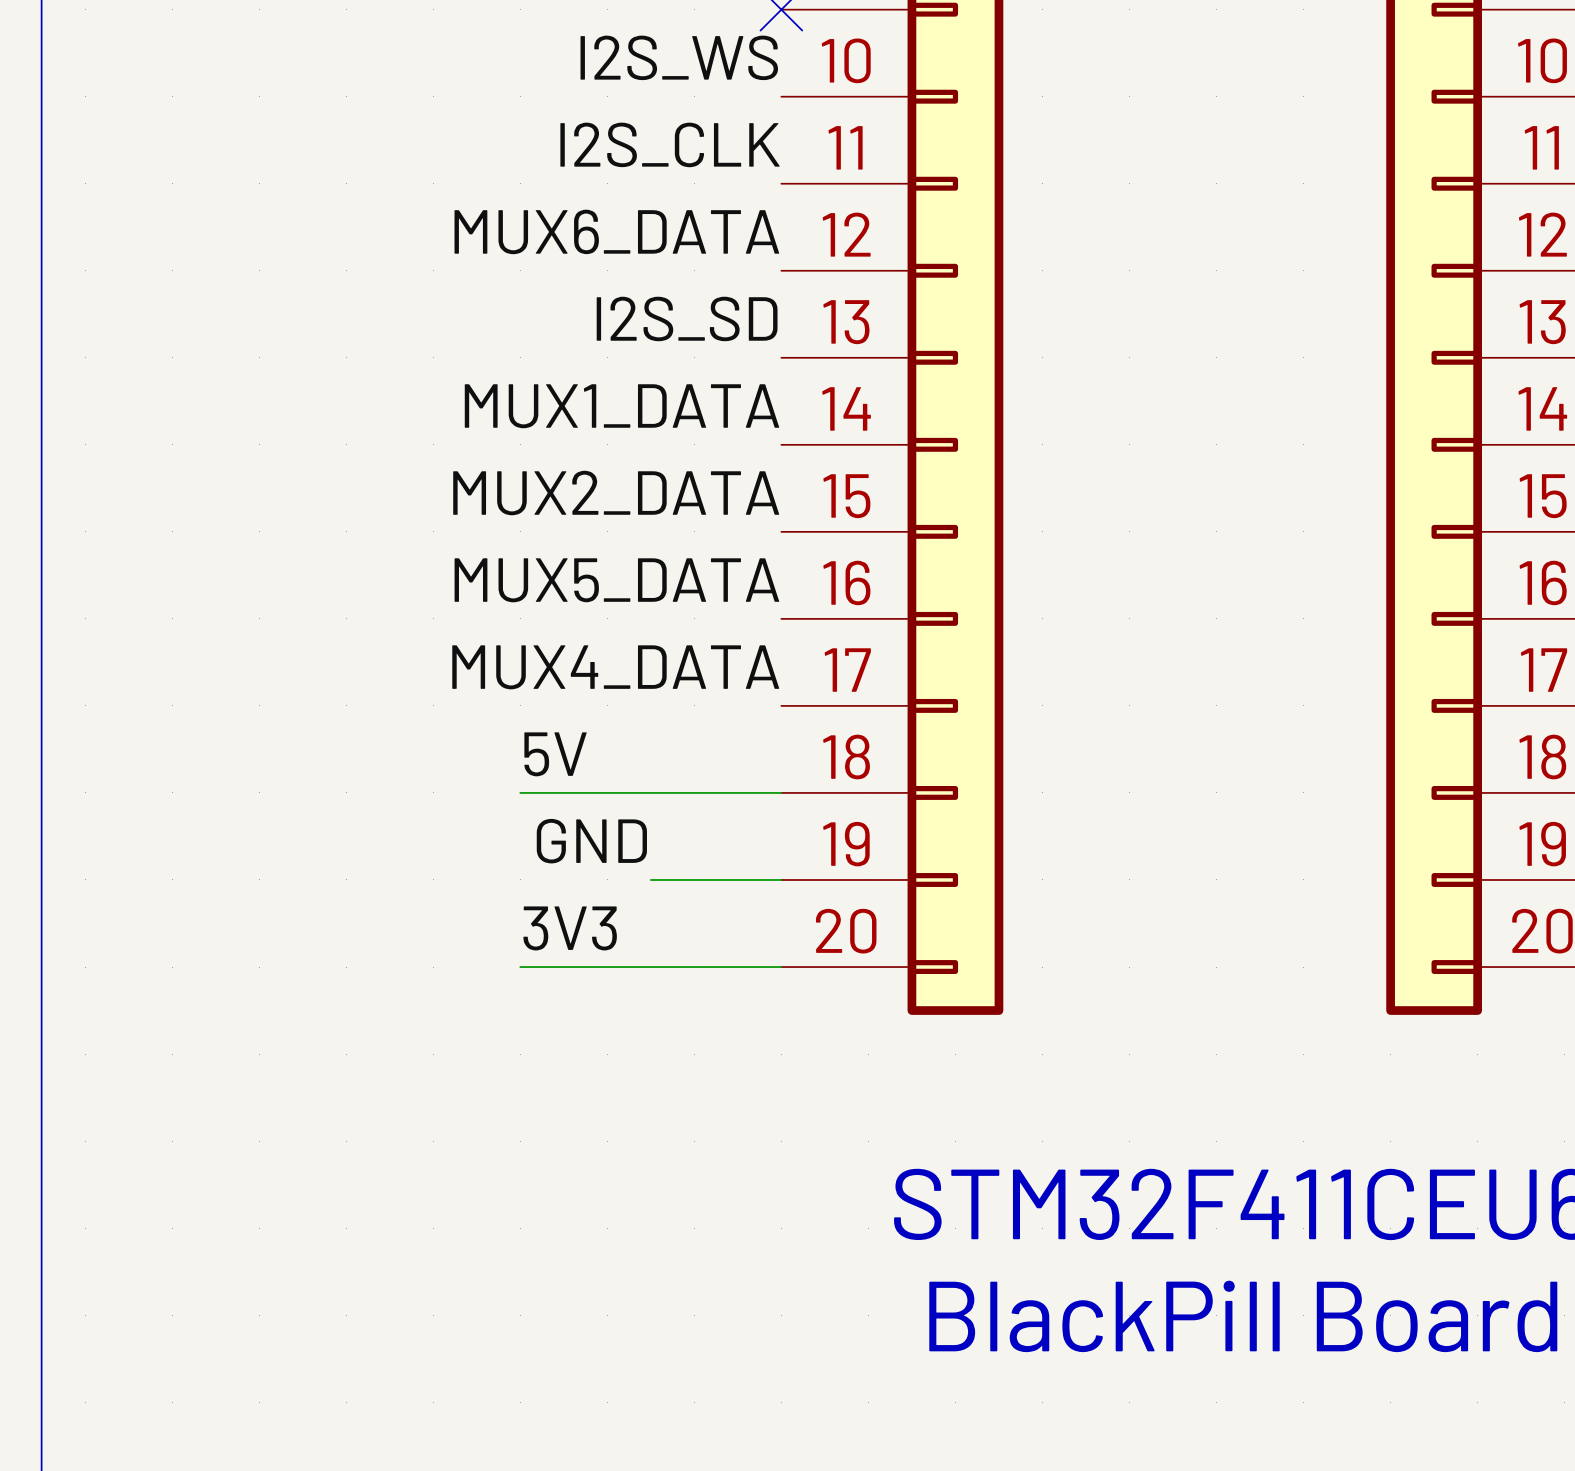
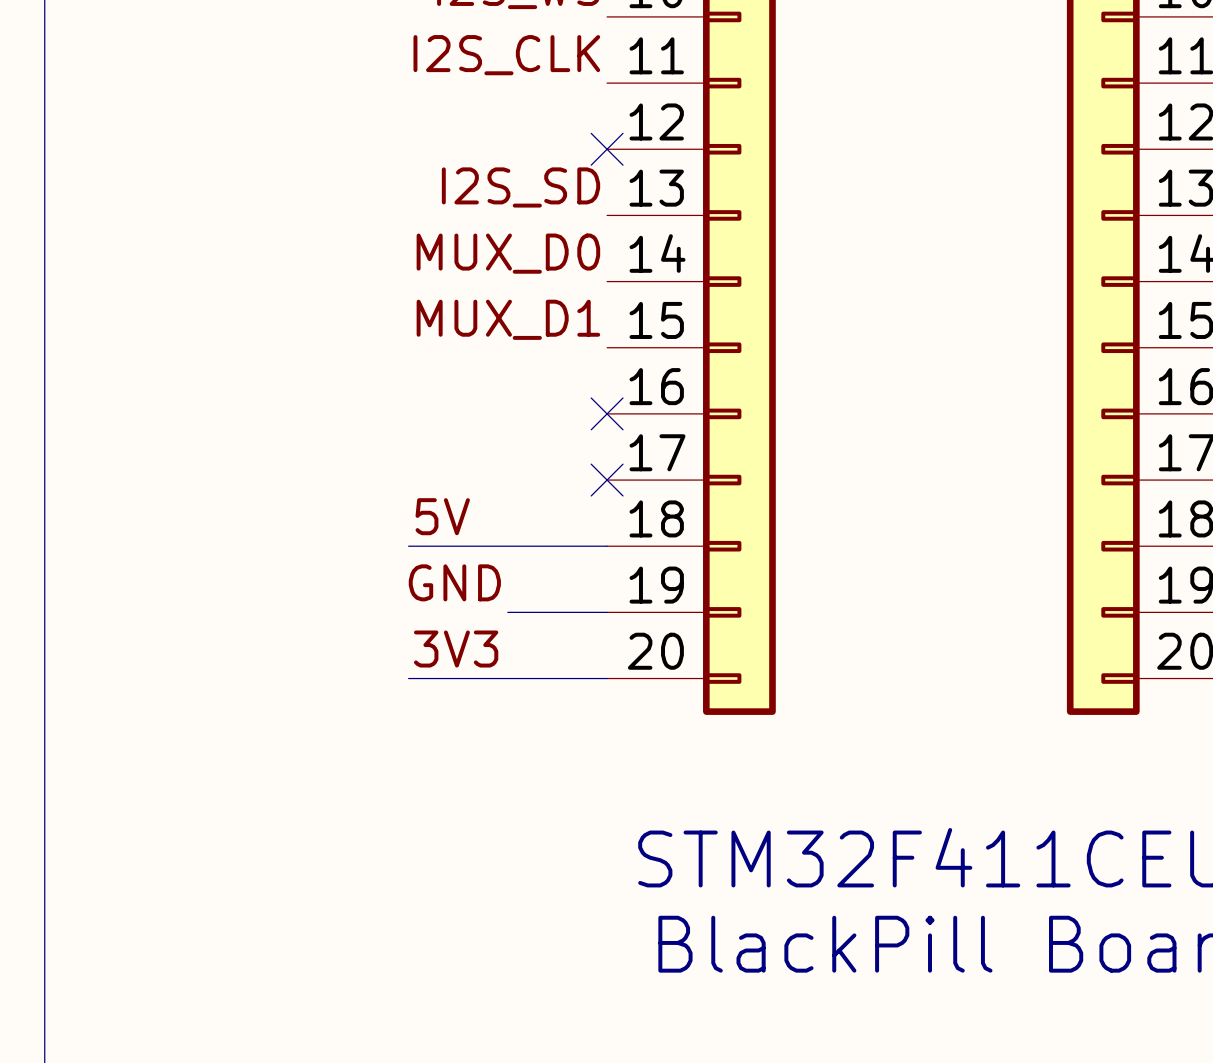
label: MUX6_DATA (616, 231) -> none
no-connect mark: none -> (607, 149)
label: MUX1_DATA (621, 406) -> MUX_D0 (508, 253)
label: MUX2_DATA (616, 493) -> MUX_D1 (508, 319)
label: MUX5_DATA (616, 580) -> none
no-connect mark: none -> (607, 413)
label: MUX4_DATA (615, 667) -> none
no-connect mark: none -> (607, 480)

